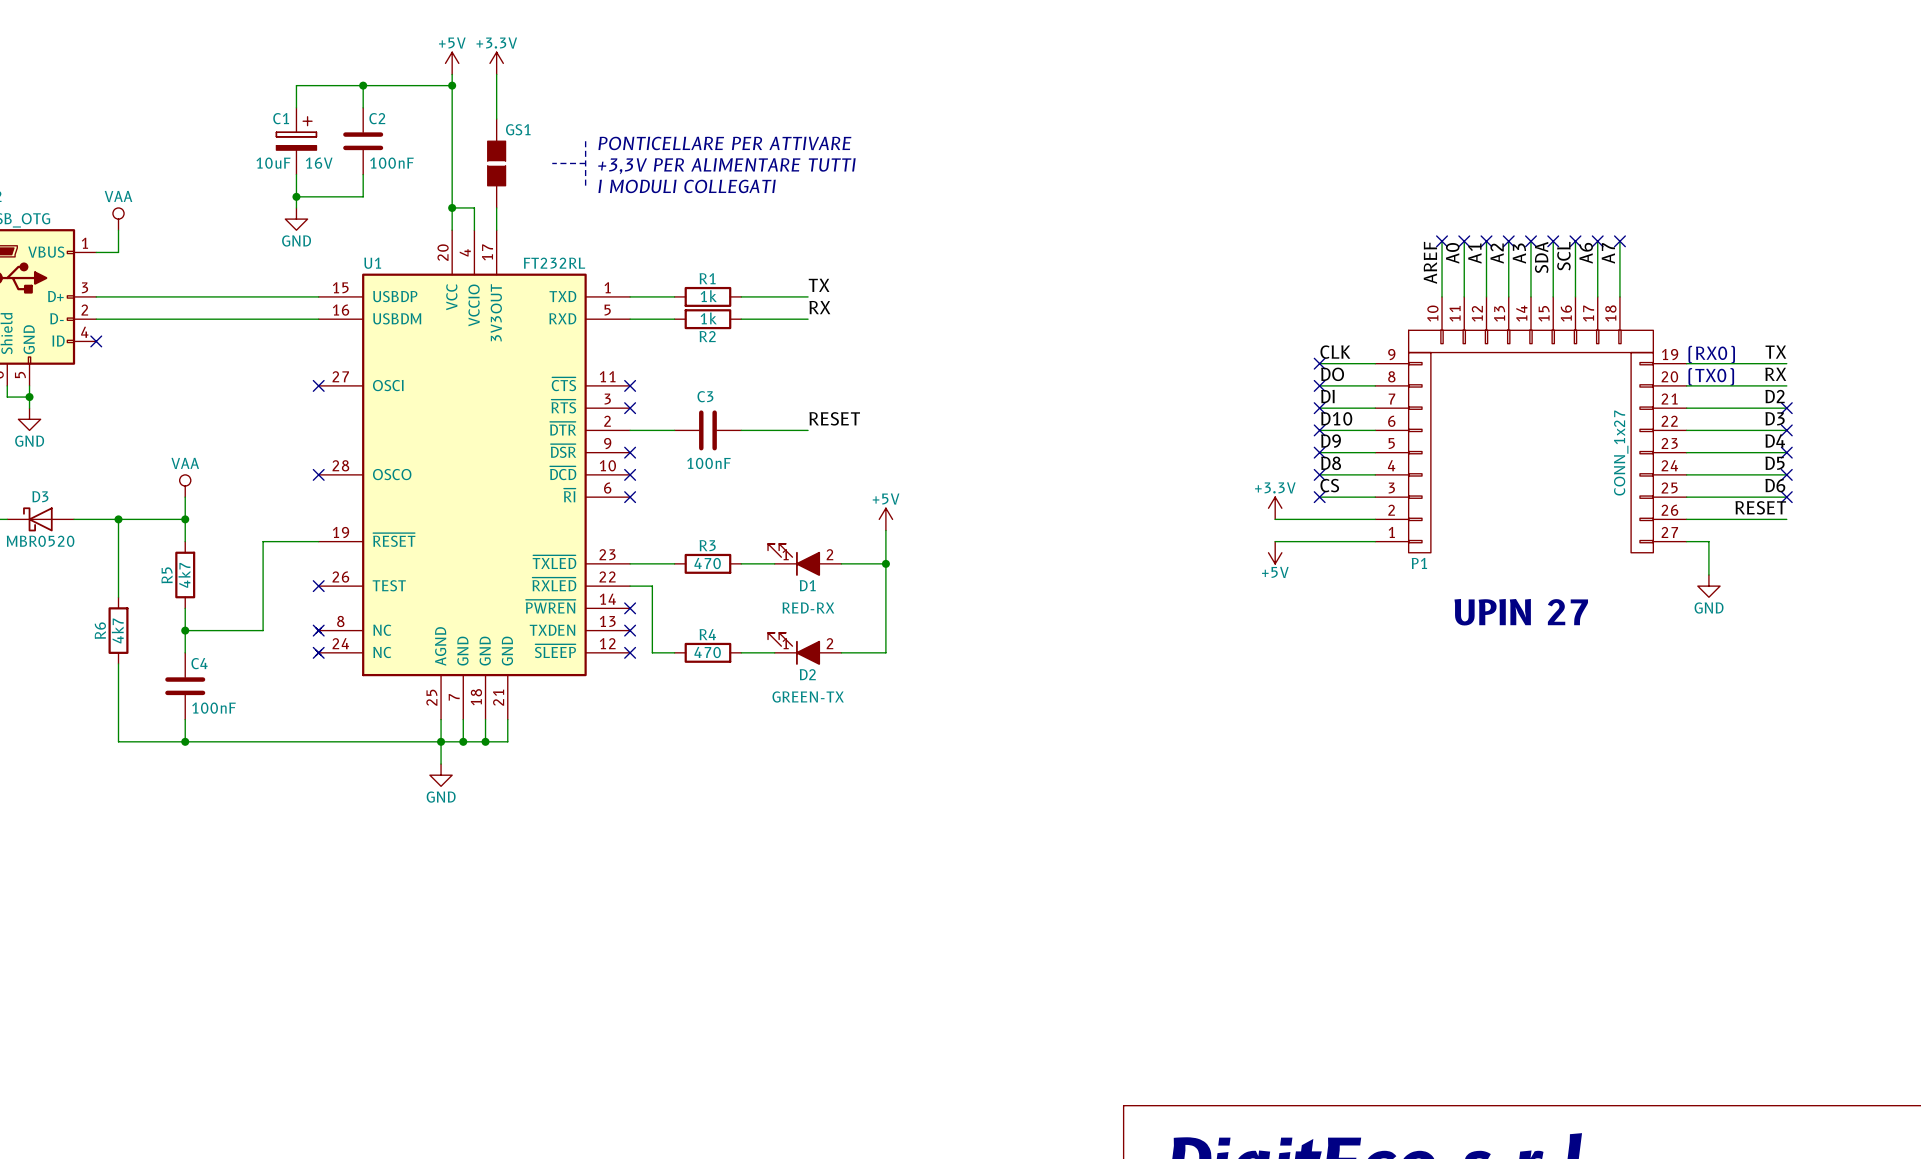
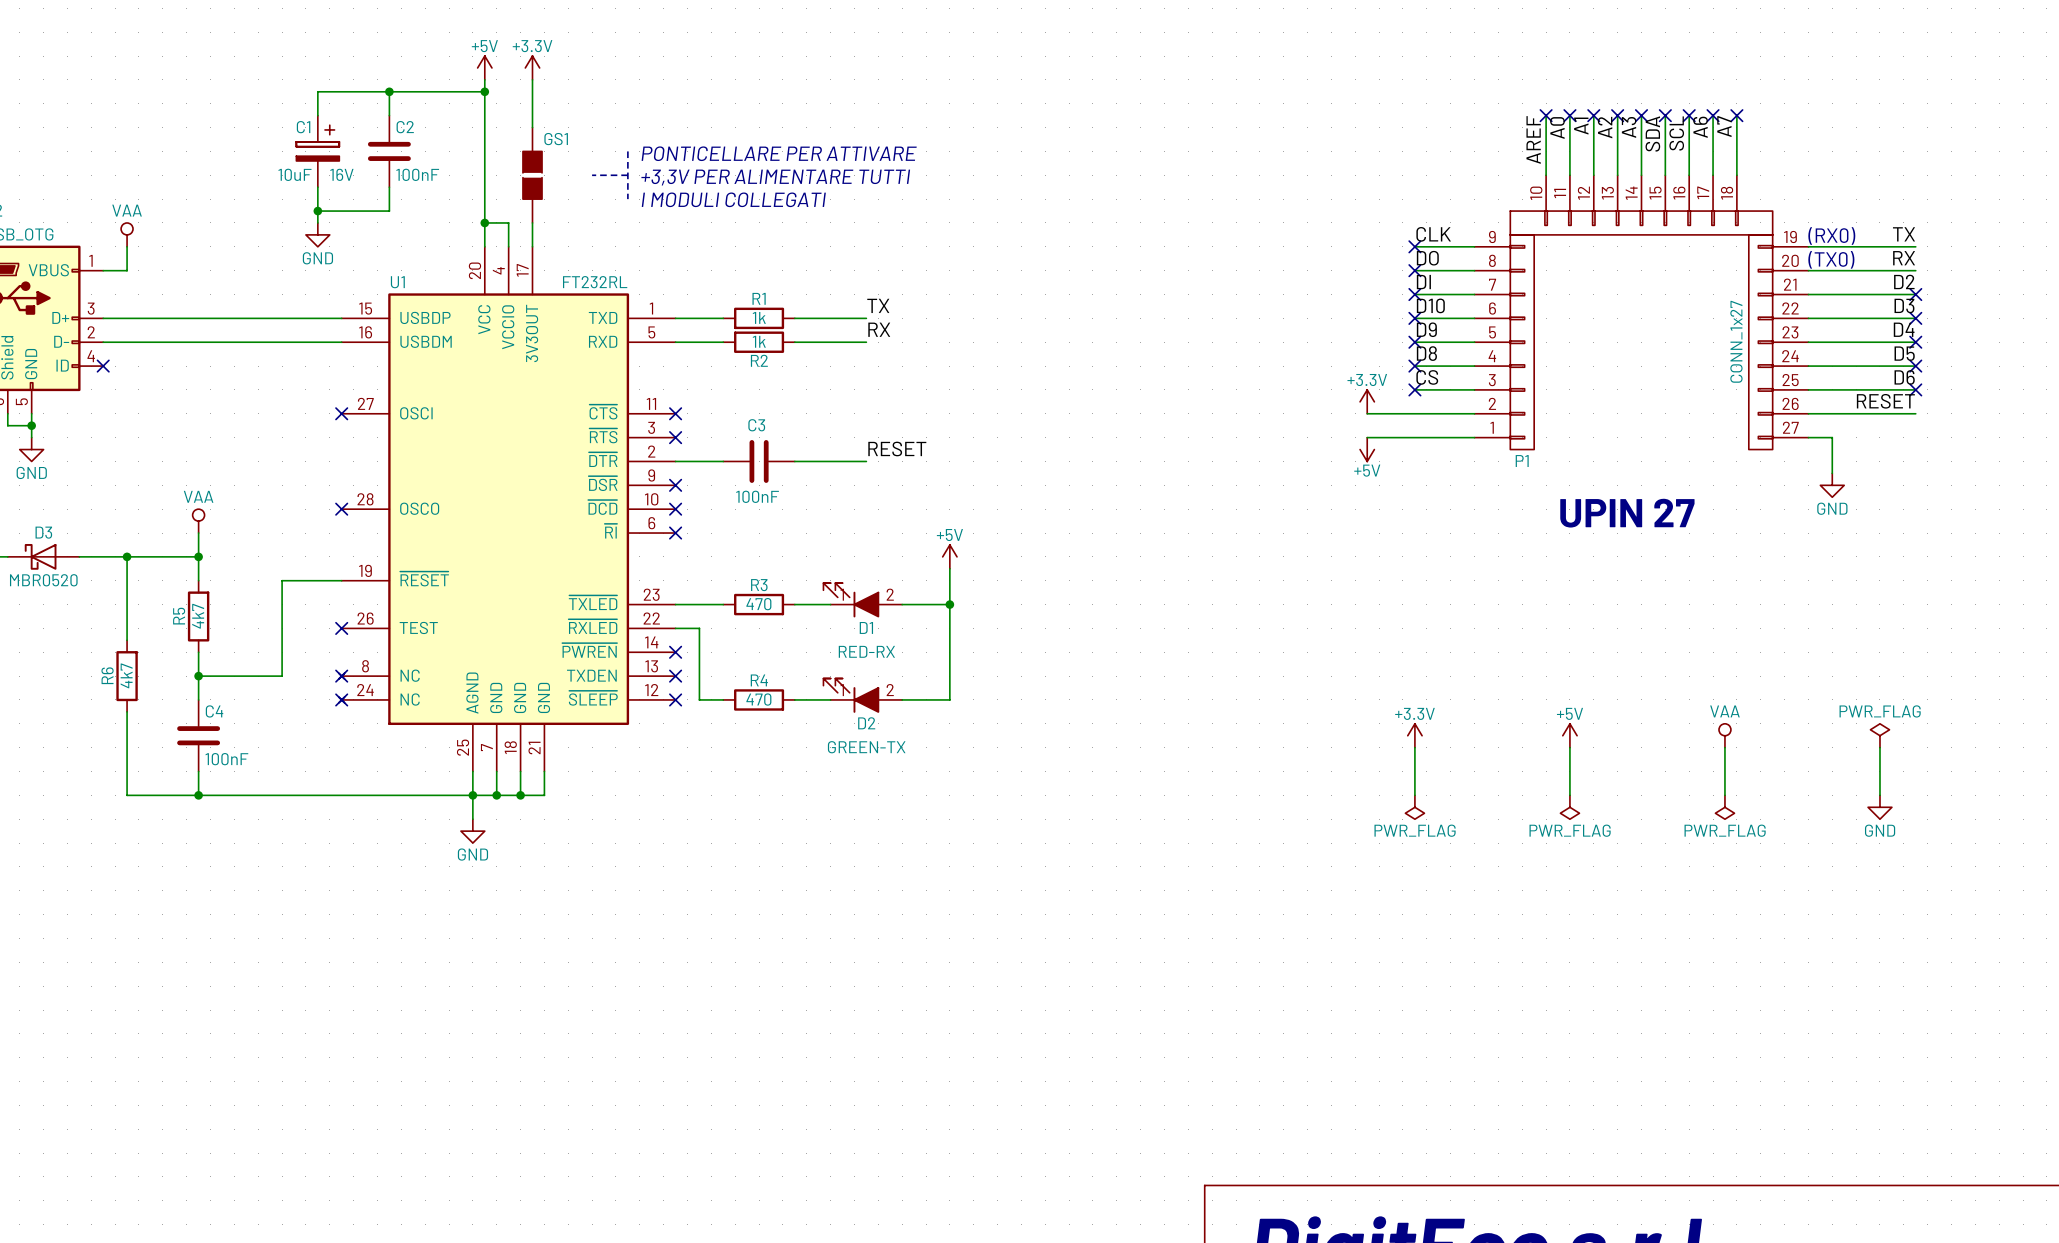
no-connect mark: none -> (1546, 115)
no-connect mark: none -> (1569, 115)
no-connect mark: none -> (1593, 115)
no-connect mark: none -> (1617, 115)
no-connect mark: none -> (1641, 115)
no-connect mark: none -> (1665, 115)
no-connect mark: none -> (1689, 115)
no-connect mark: none -> (1713, 115)
no-connect mark: none -> (1736, 115)
label: none -> CLK (1433, 234)
label: none -> TX (1903, 234)
wire: none -> (1414, 246) (1474, 246)
no-connect mark: none -> (1414, 246)
wire: none -> (1808, 246) (1915, 246)
label: none -> RX (1904, 258)
wire: (1442, 241) (1442, 296) -> (1546, 115) (1546, 175)
no-connect mark: (1442, 241) -> none
wire: (1464, 241) (1464, 296) -> (1569, 115) (1569, 175)
no-connect mark: (1464, 241) -> none
wire: (1486, 241) (1486, 296) -> (1593, 115) (1593, 175)
no-connect mark: (1486, 241) -> none
wire: (1508, 241) (1508, 296) -> (1617, 115) (1617, 175)
no-connect mark: (1508, 241) -> none
wire: (1530, 241) (1530, 296) -> (1641, 115) (1641, 175)
no-connect mark: (1530, 241) -> none
wire: (1553, 241) (1553, 296) -> (1665, 115) (1665, 175)
no-connect mark: (1553, 241) -> none
wire: (1575, 241) (1575, 296) -> (1689, 115) (1689, 175)
no-connect mark: (1575, 241) -> none
wire: (1597, 241) (1597, 296) -> (1713, 115) (1713, 175)
no-connect mark: (1597, 241) -> none
wire: (1619, 241) (1619, 296) -> (1736, 115) (1736, 175)
no-connect mark: (1619, 241) -> none
wire: none -> (1414, 270) (1474, 270)
no-connect mark: none -> (1414, 270)
wire: none -> (1808, 270) (1915, 270)
label position: A0 (1452, 253) -> A0 (1557, 128)
label position: A1 (1474, 253) -> A1 (1581, 126)
label position: A2 (1497, 253) -> A2 (1605, 127)
label position: A3 (1519, 253) -> A3 (1629, 127)
label position: A6 (1586, 253) -> A6 (1700, 127)
label position: A7 (1608, 253) -> A7 (1724, 126)
label position: SCL (1563, 256) -> SCL (1676, 133)
label position: SDA (1541, 257) -> SDA (1652, 133)
label position: AREF (1430, 262) -> AREF (1533, 139)
wire: none -> (1414, 294) (1474, 294)
no-connect mark: none -> (1414, 294)
wire: none -> (1808, 294) (1915, 294)
no-connect mark: none -> (1915, 294)
no-connect mark: none -> (1414, 318)
no-connect mark: none -> (1915, 318)
no-connect mark: none -> (1414, 342)
no-connect mark: none -> (1915, 342)
no-connect mark: none -> (1414, 366)
no-connect mark: none -> (1915, 366)
label: CLK (1335, 352) -> CS (1427, 377)
label: TX (1775, 352) -> D6 (1904, 377)
text position: (RX0) (1711, 354) -> (RX0) (1831, 235)
no-connect mark: none -> (1915, 389)
power symbol: none -> +3.3V (1367, 401)
label position: DO (1332, 374) -> DO (1427, 258)
label: RX (1775, 374) -> RESET (1885, 401)
text position: (TX0) (1711, 376) -> (TX0) (1831, 259)
wire: none -> (1367, 413) (1414, 413)
no-connect mark: (1319, 385) -> none
label position: DI (1327, 396) -> DI (1423, 282)
label position: D2 (1775, 396) -> D2 (1904, 281)
wire: none -> (1367, 437) (1414, 437)
no-connect mark: (1319, 408) -> none
wire: (1708, 408) (1786, 408) -> (1832, 437) (1832, 473)
no-connect mark: (1786, 408) -> none
label position: D10 (1336, 418) -> D10 (1430, 305)
label position: D3 (1775, 418) -> D3 (1904, 305)
power symbol: none -> +5V (1367, 449)
P1 position: (1530, 424) -> (1641, 312)
wire: (1319, 430) (1375, 430) -> (1414, 318) (1474, 318)
no-connect mark: (1319, 430) -> none
wire: (1686, 430) (1786, 430) -> (1808, 318) (1915, 318)
no-connect mark: (1786, 430) -> none
label position: D9 (1331, 441) -> D9 (1426, 329)
label position: D4 (1775, 441) -> D4 (1904, 329)
wire: (1319, 452) (1375, 452) -> (1414, 342) (1474, 342)
no-connect mark: (1319, 452) -> none
wire: (1686, 452) (1786, 452) -> (1808, 342) (1915, 342)
power symbol: none -> GND (1832, 485)
no-connect mark: (1786, 452) -> none
label position: D8 (1331, 463) -> D8 (1426, 353)
label position: D5 (1775, 463) -> D5 (1904, 353)
wire: (1319, 474) (1375, 474) -> (1414, 366) (1474, 366)
no-connect mark: (1319, 474) -> none
wire: (1686, 474) (1786, 474) -> (1808, 366) (1915, 366)
no-connect mark: (1786, 474) -> none
label: CS (1329, 485) -> none
label: D6 (1775, 485) -> none
wire: (1319, 497) (1375, 497) -> none
no-connect mark: (1319, 497) -> none
wire: (1686, 497) (1786, 497) -> none
no-connect mark: (1786, 497) -> none
label: RESET (1760, 507) -> none
power symbol: +3.3V (1275, 508) -> none
wire: (1275, 519) (1375, 519) -> none
wire: (1686, 519) (1786, 519) -> none
wire: (1275, 541) (1375, 541) -> none
wire: (1686, 541) (1708, 541) (1708, 574) -> none
power symbol: +5V (1275, 552) -> none
power symbol: GND (1708, 586) -> none
text position: UPIN 27 (1521, 612) -> UPIN 27 (1627, 513)
power symbol: none -> +3.3V (1414, 735)
power symbol: none -> +5V (1569, 735)
power symbol: none -> VAA (1724, 735)
power symbol: none -> PWR_FLAG (1879, 735)
wire: none -> (1414, 747) (1414, 795)
wire: none -> (1569, 747) (1569, 795)
wire: none -> (1724, 747) (1724, 795)
wire: none -> (1879, 747) (1879, 795)
power symbol: none -> PWR_FLAG (1414, 807)
power symbol: none -> PWR_FLAG (1569, 807)
power symbol: none -> PWR_FLAG (1724, 807)
power symbol: none -> GND (1879, 807)

